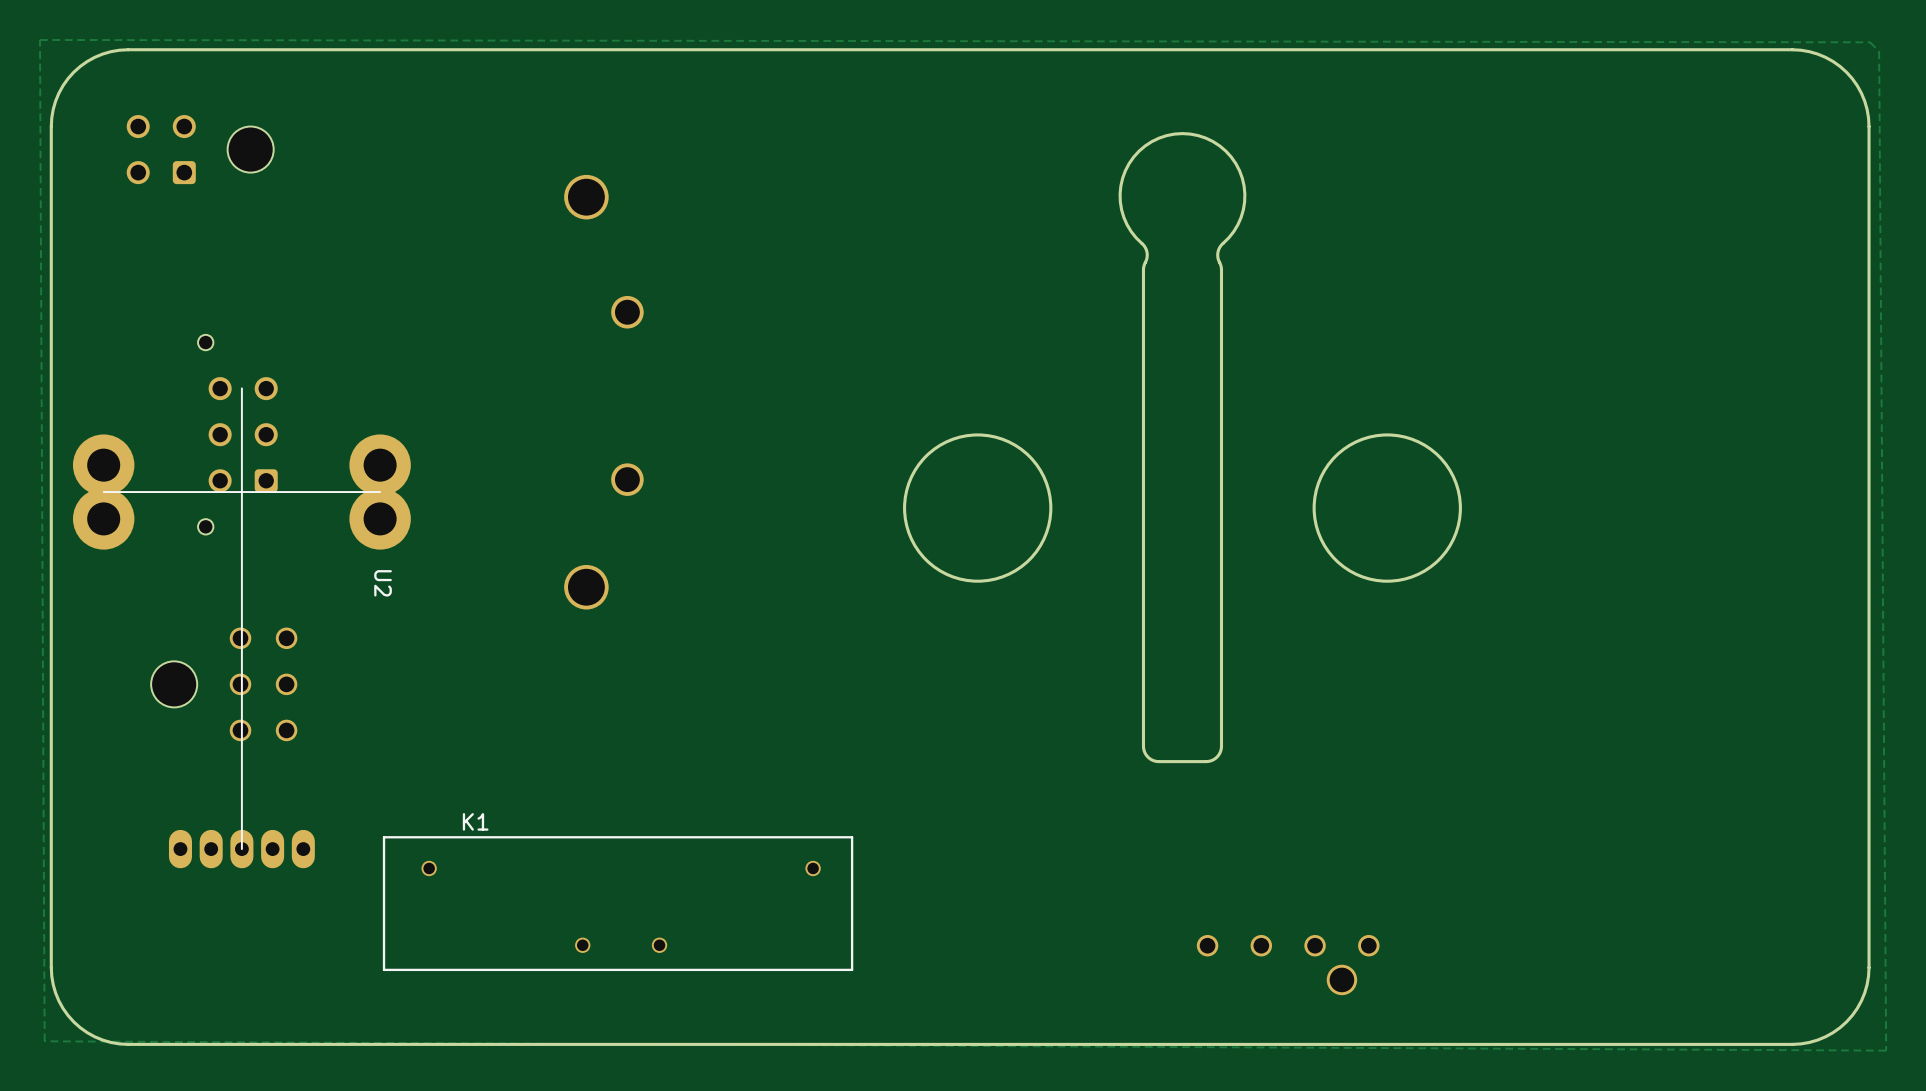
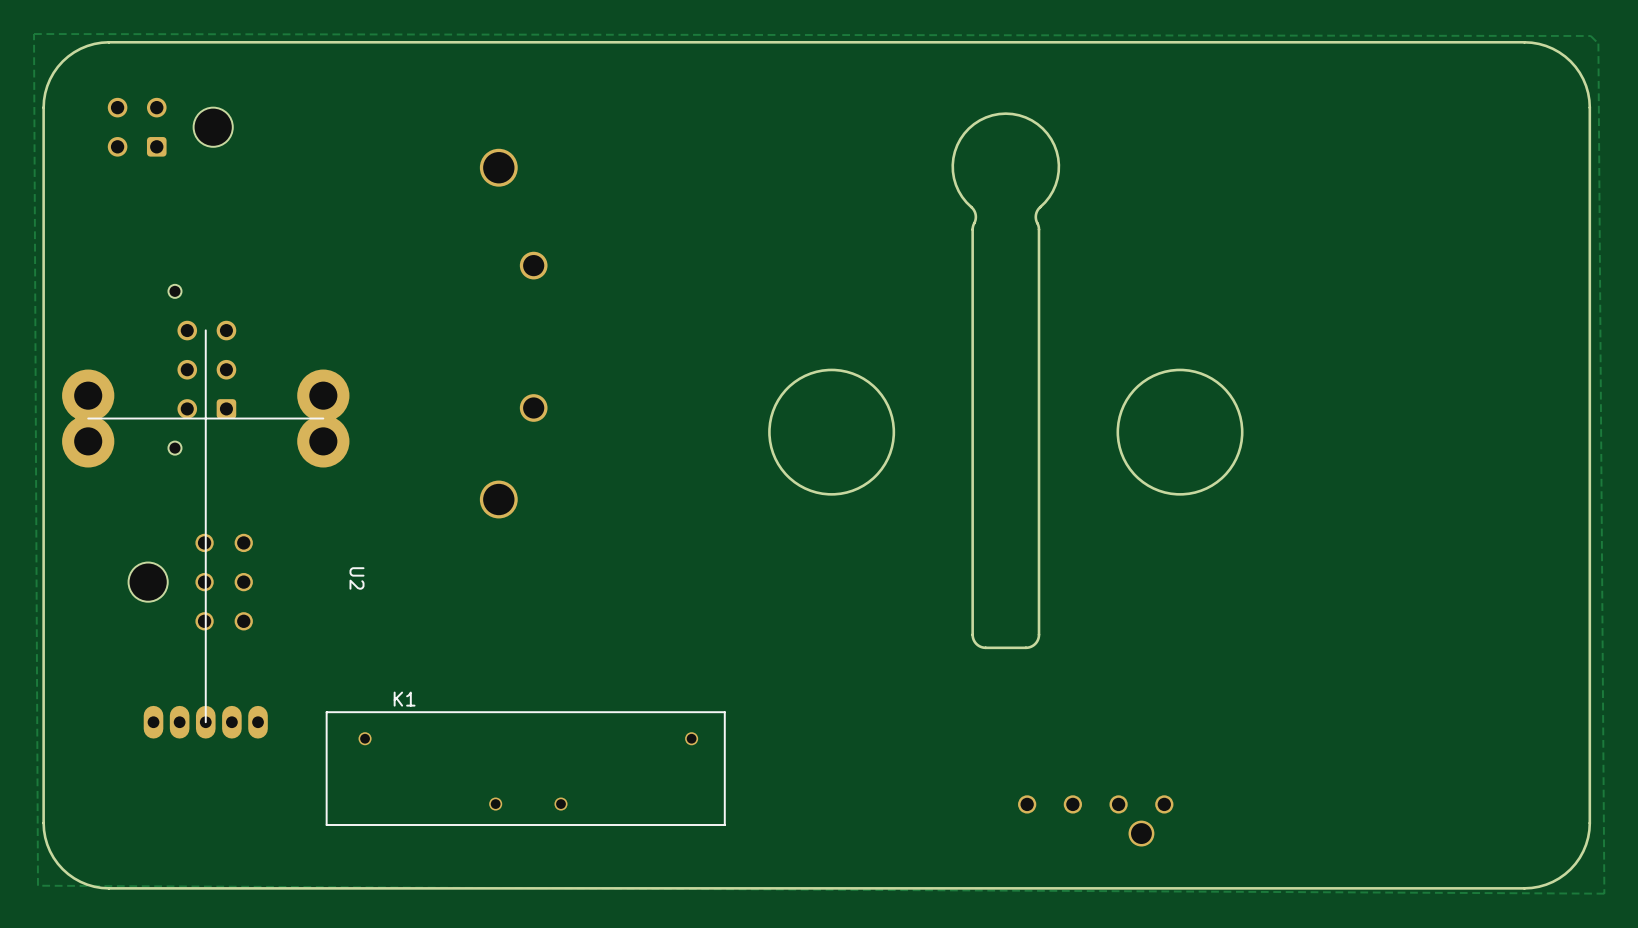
U2 name position: U2 (383, 583) -> U2 (356, 578)

